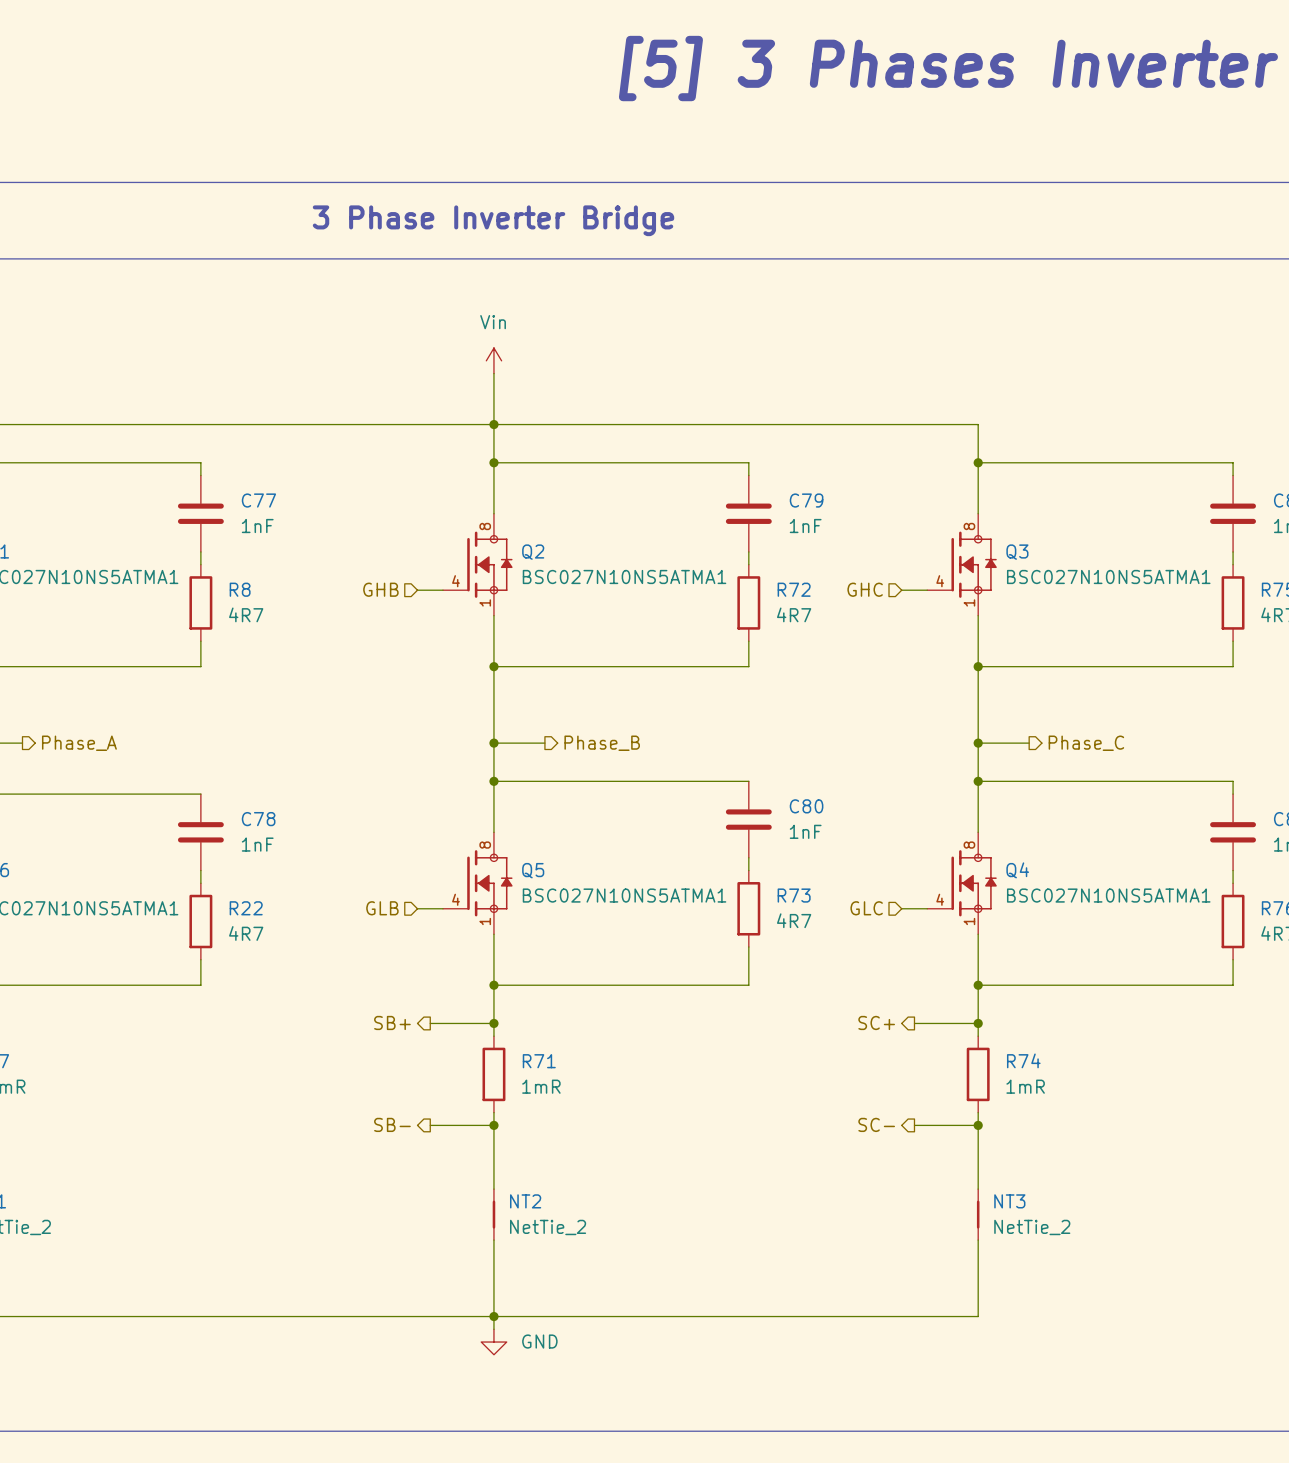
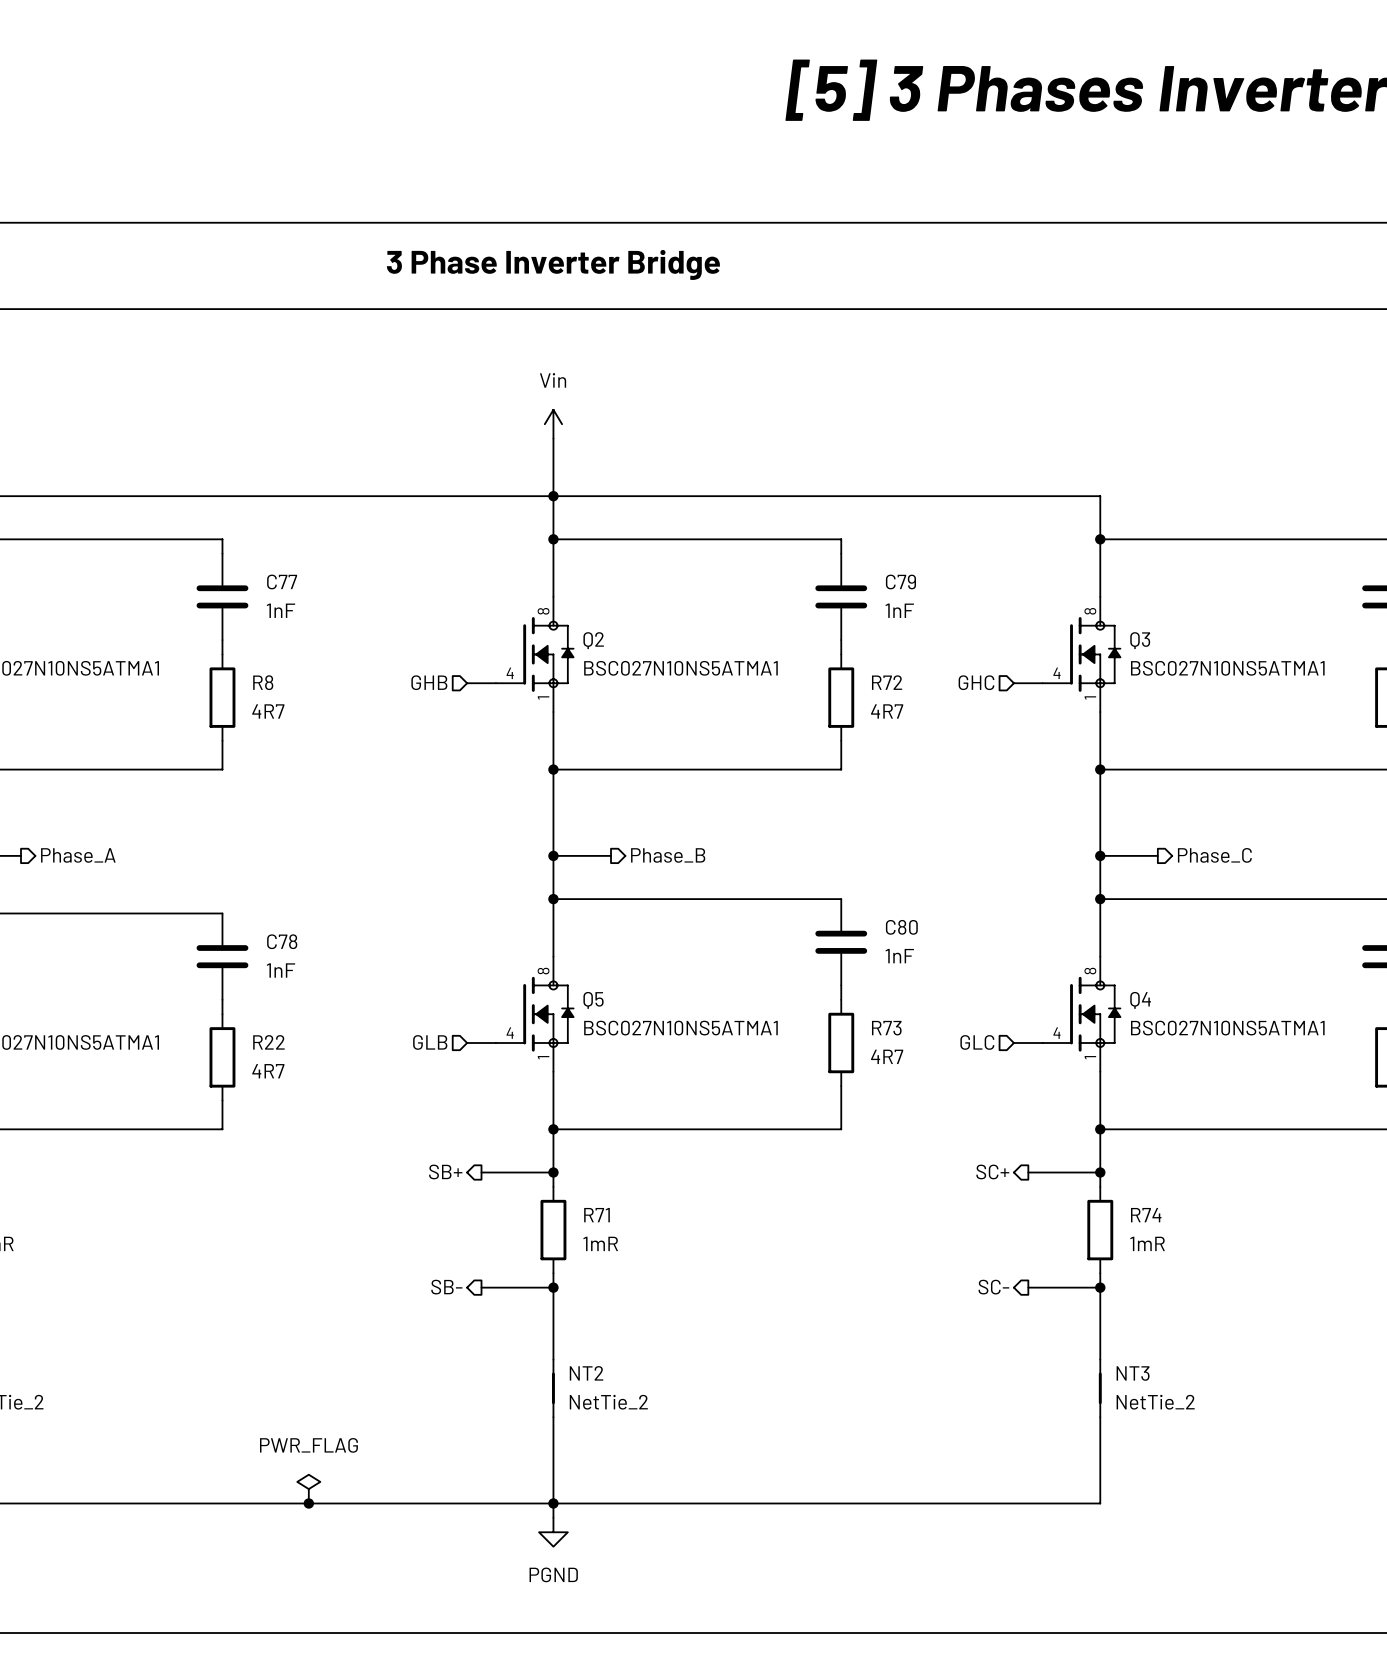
power symbol: none -> PWR_FLAG (308, 1489)
junction: none -> (308, 1503)
power symbol: GND (493, 1342) -> PGND (553, 1532)

